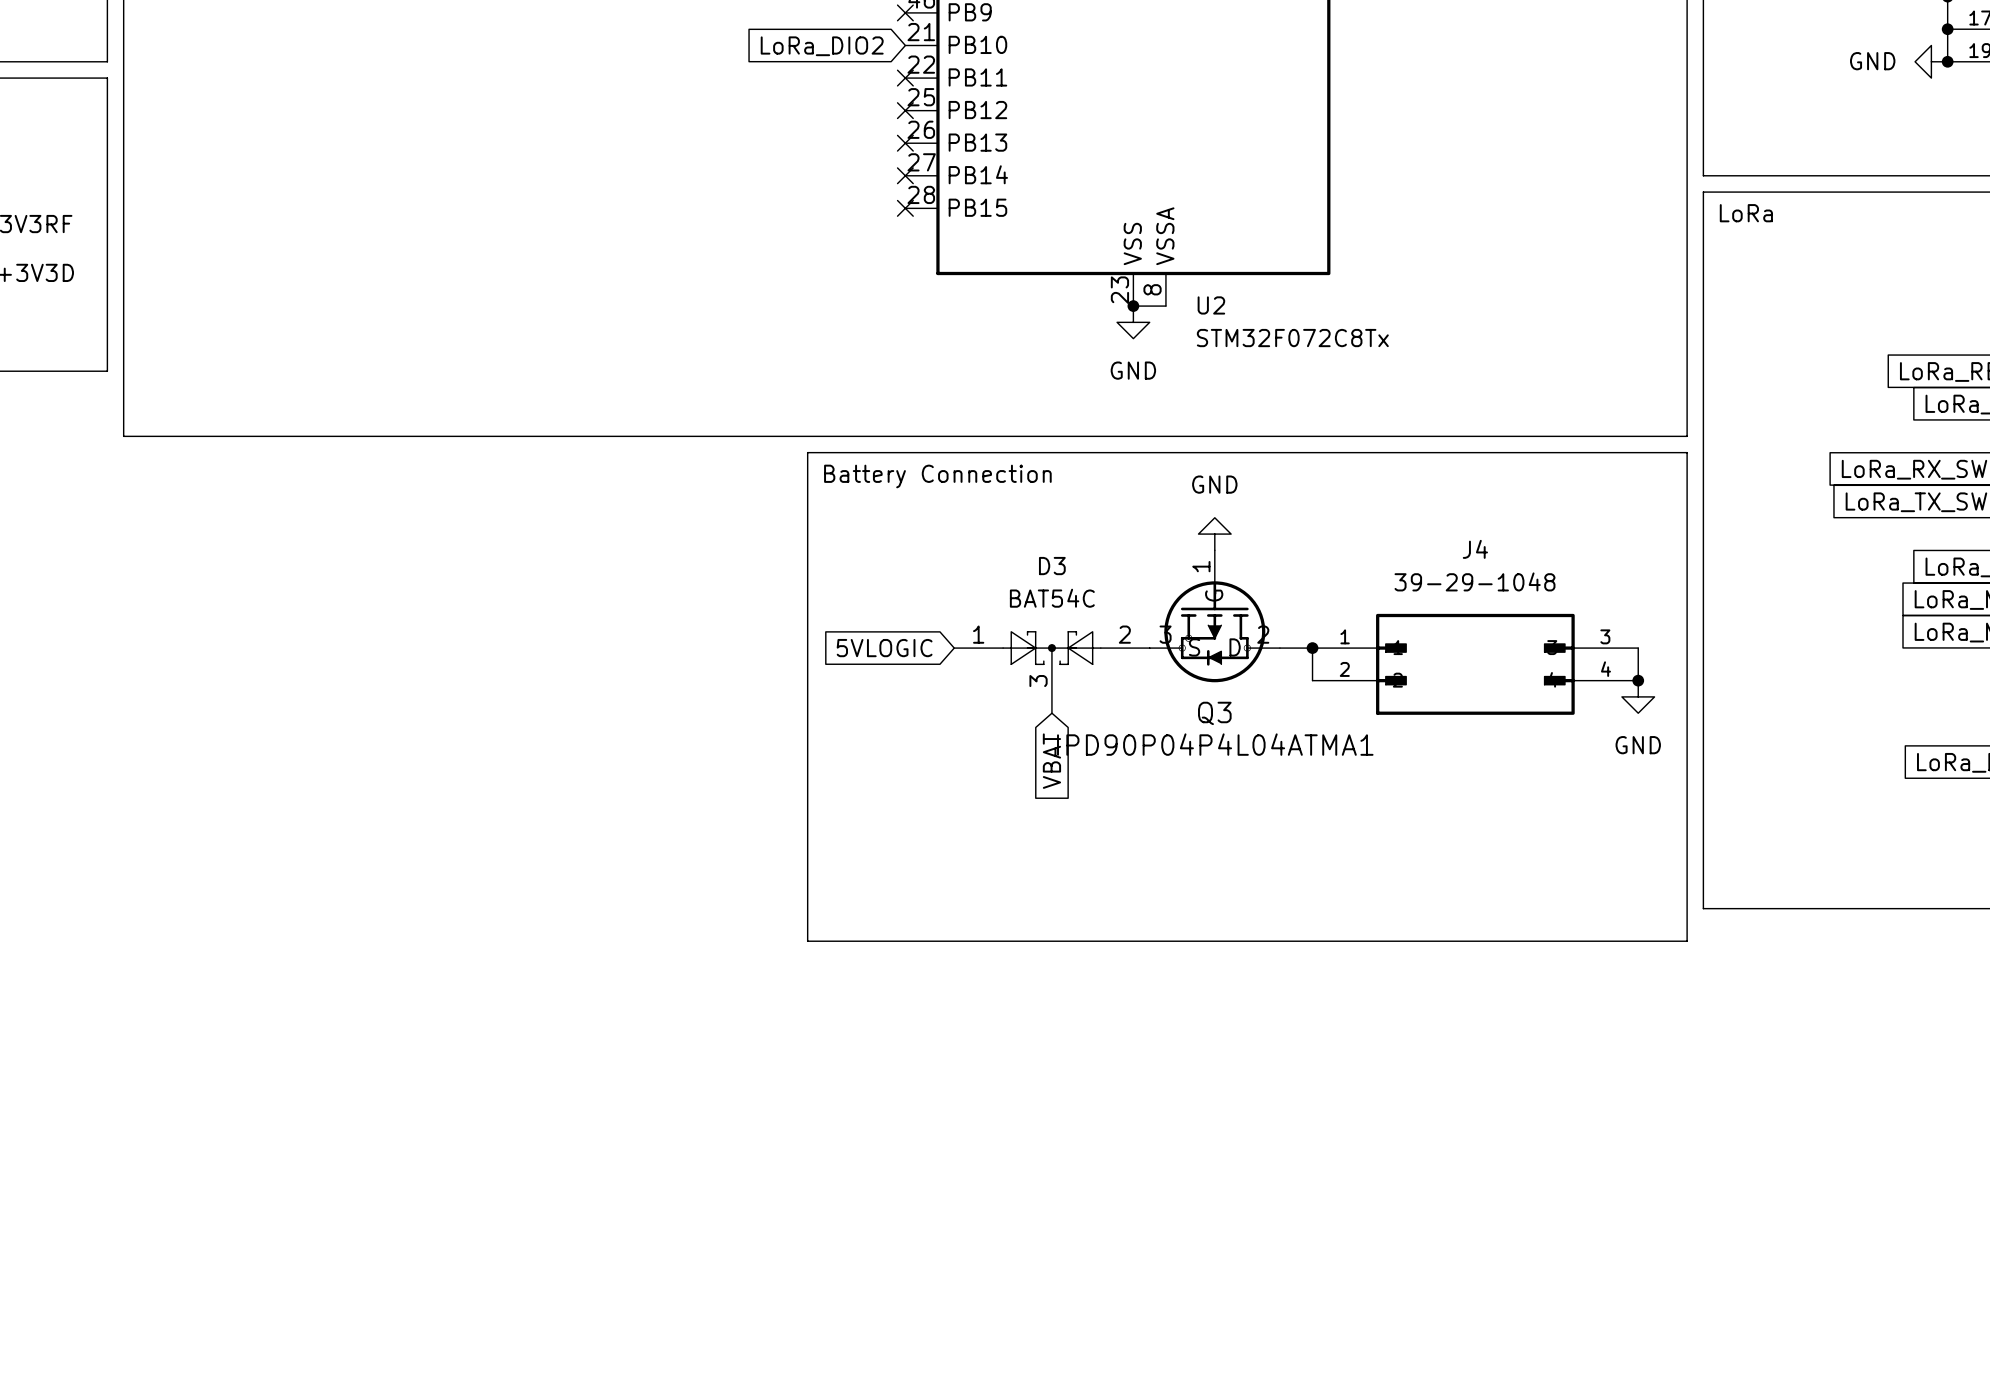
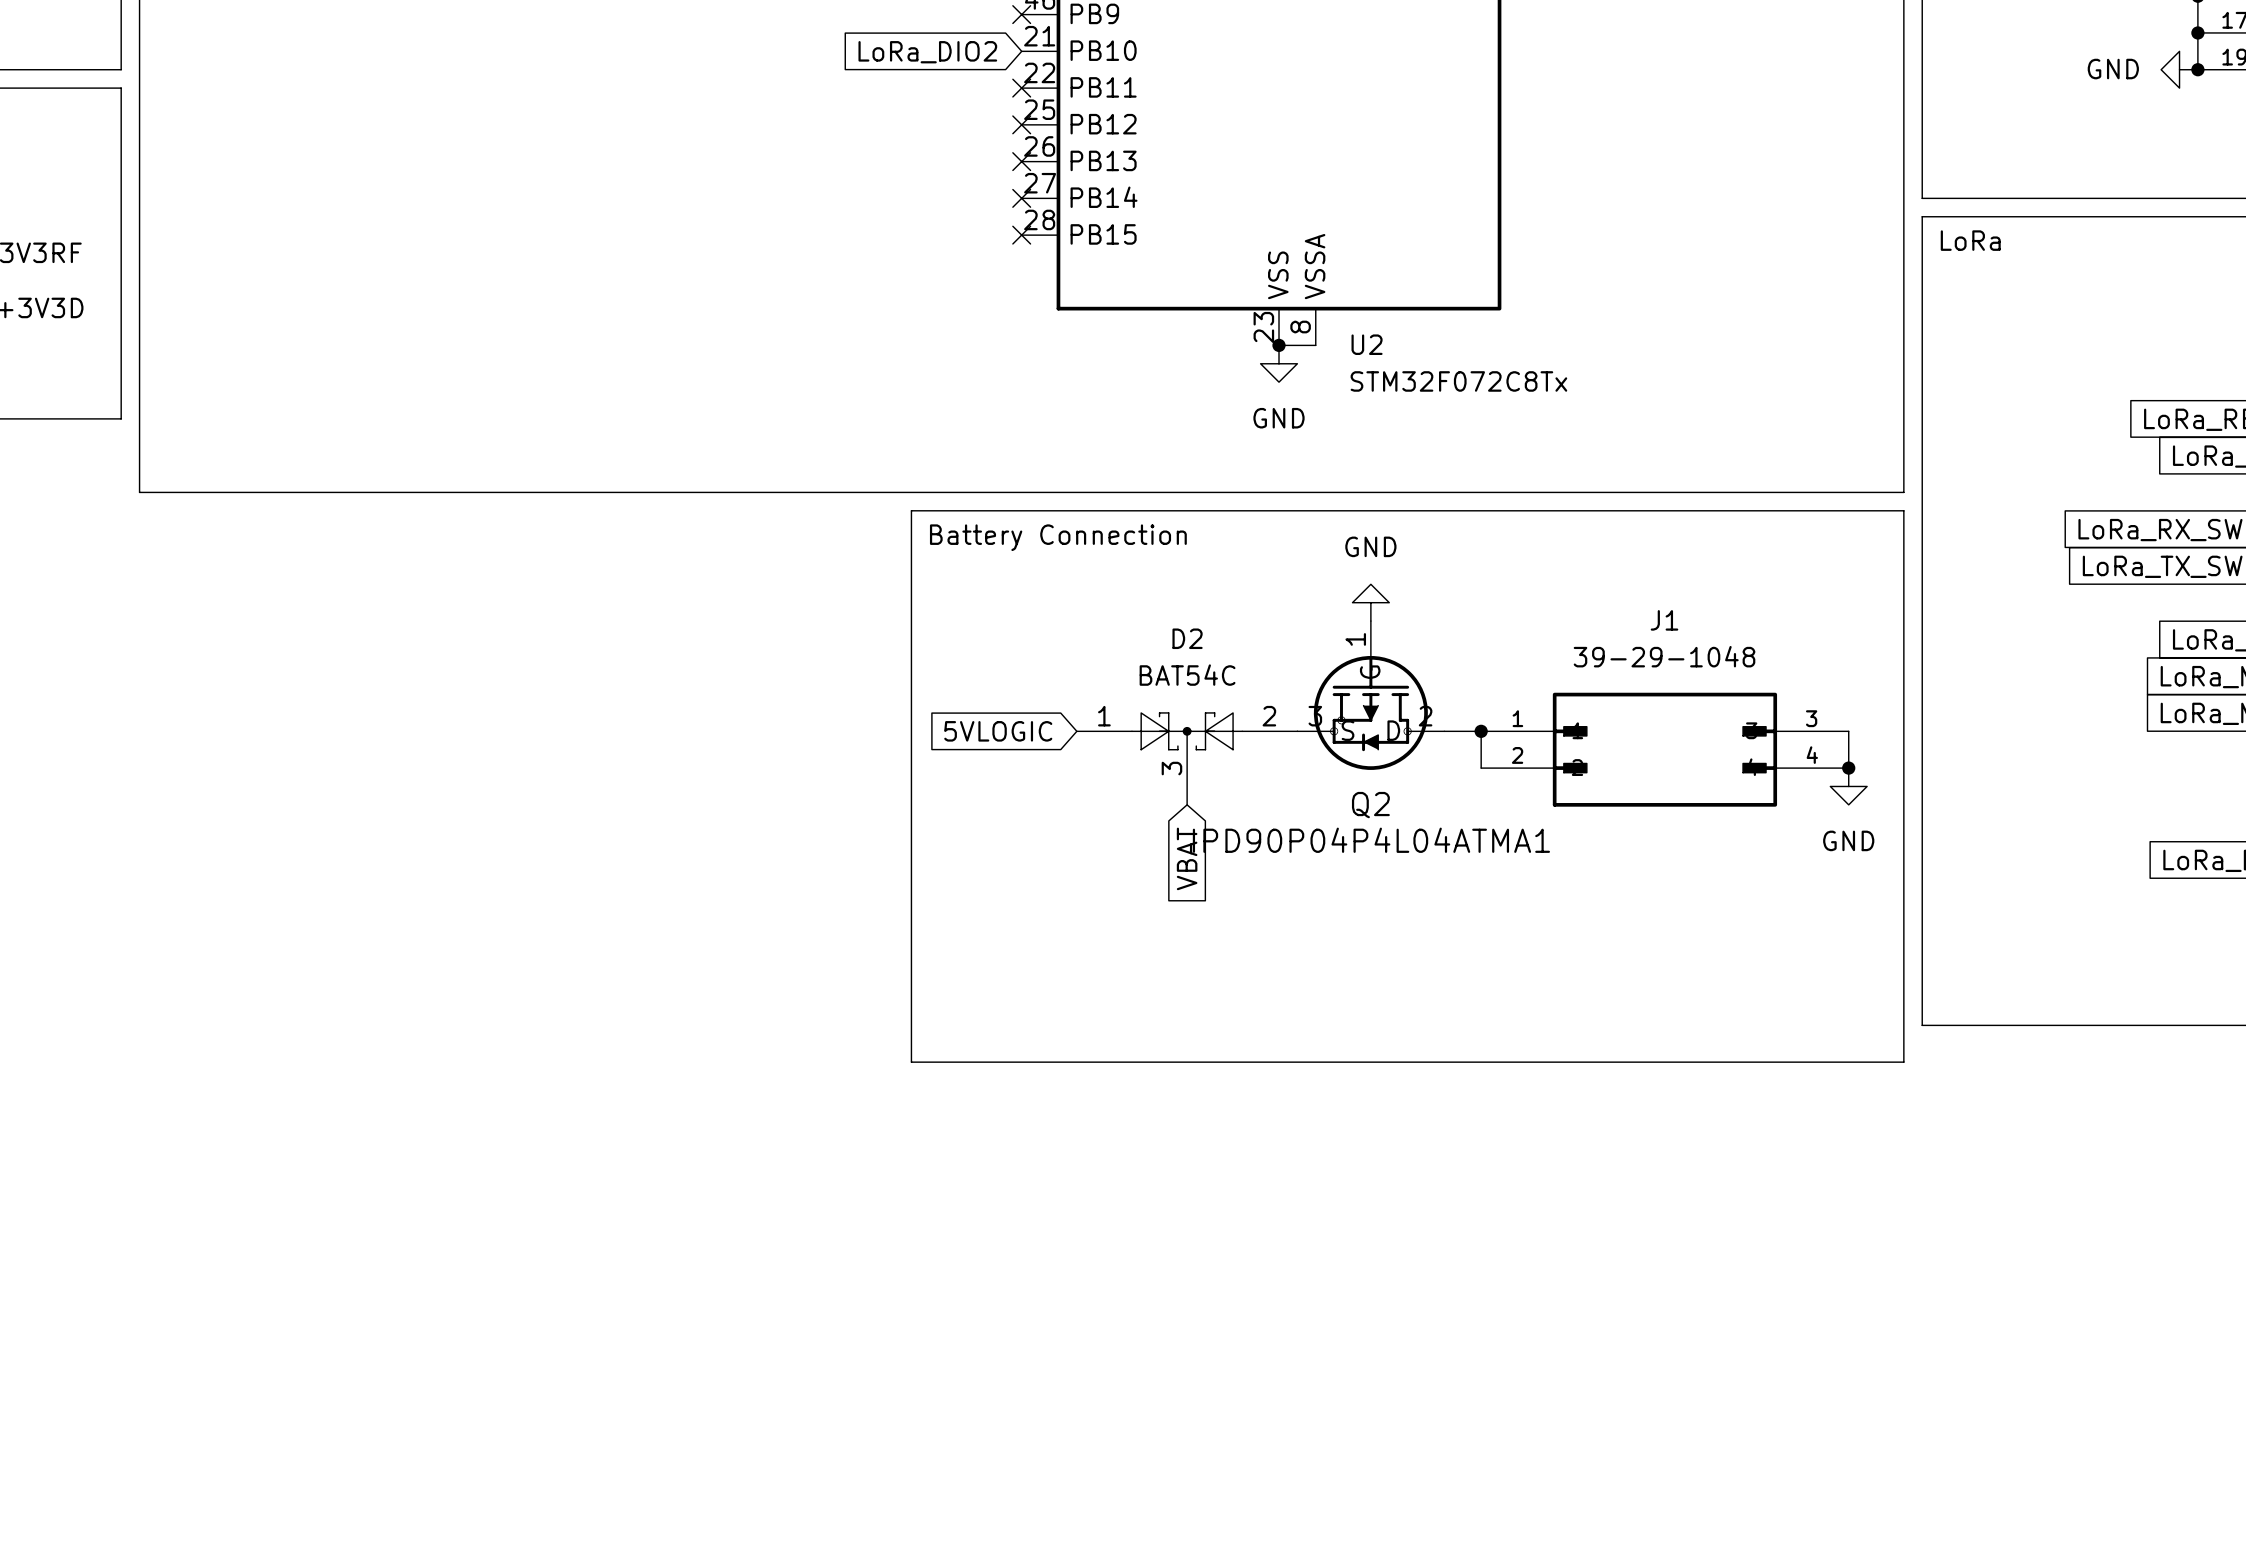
J4 name: J4 (1475, 549) -> J1 (1664, 620)
D3 name: D3 (1052, 566) -> D2 (1187, 638)
Q3 name: Q3 (1214, 713) -> Q2 (1370, 805)

